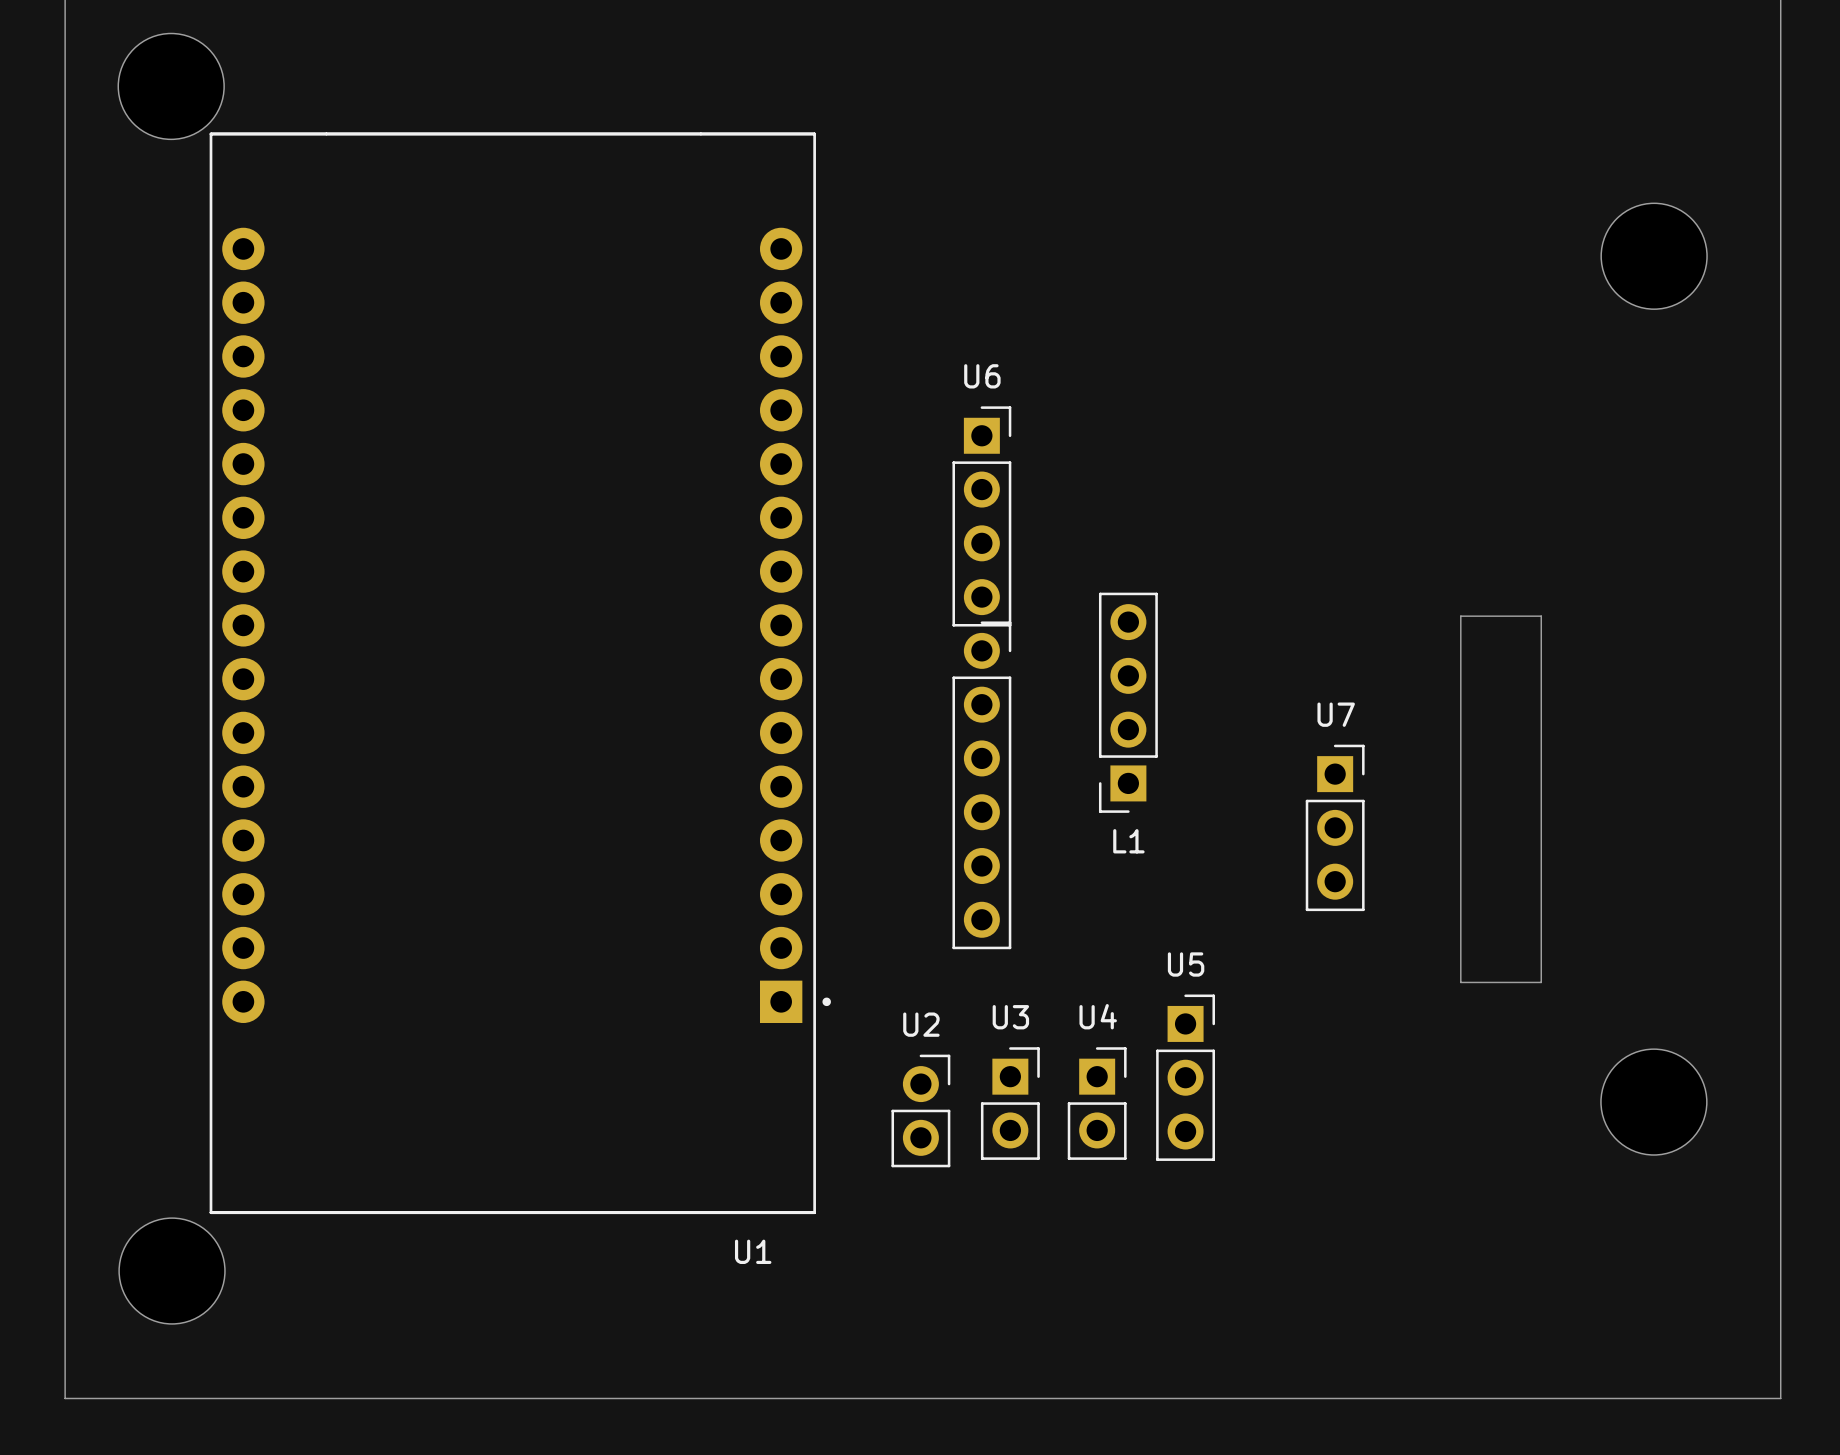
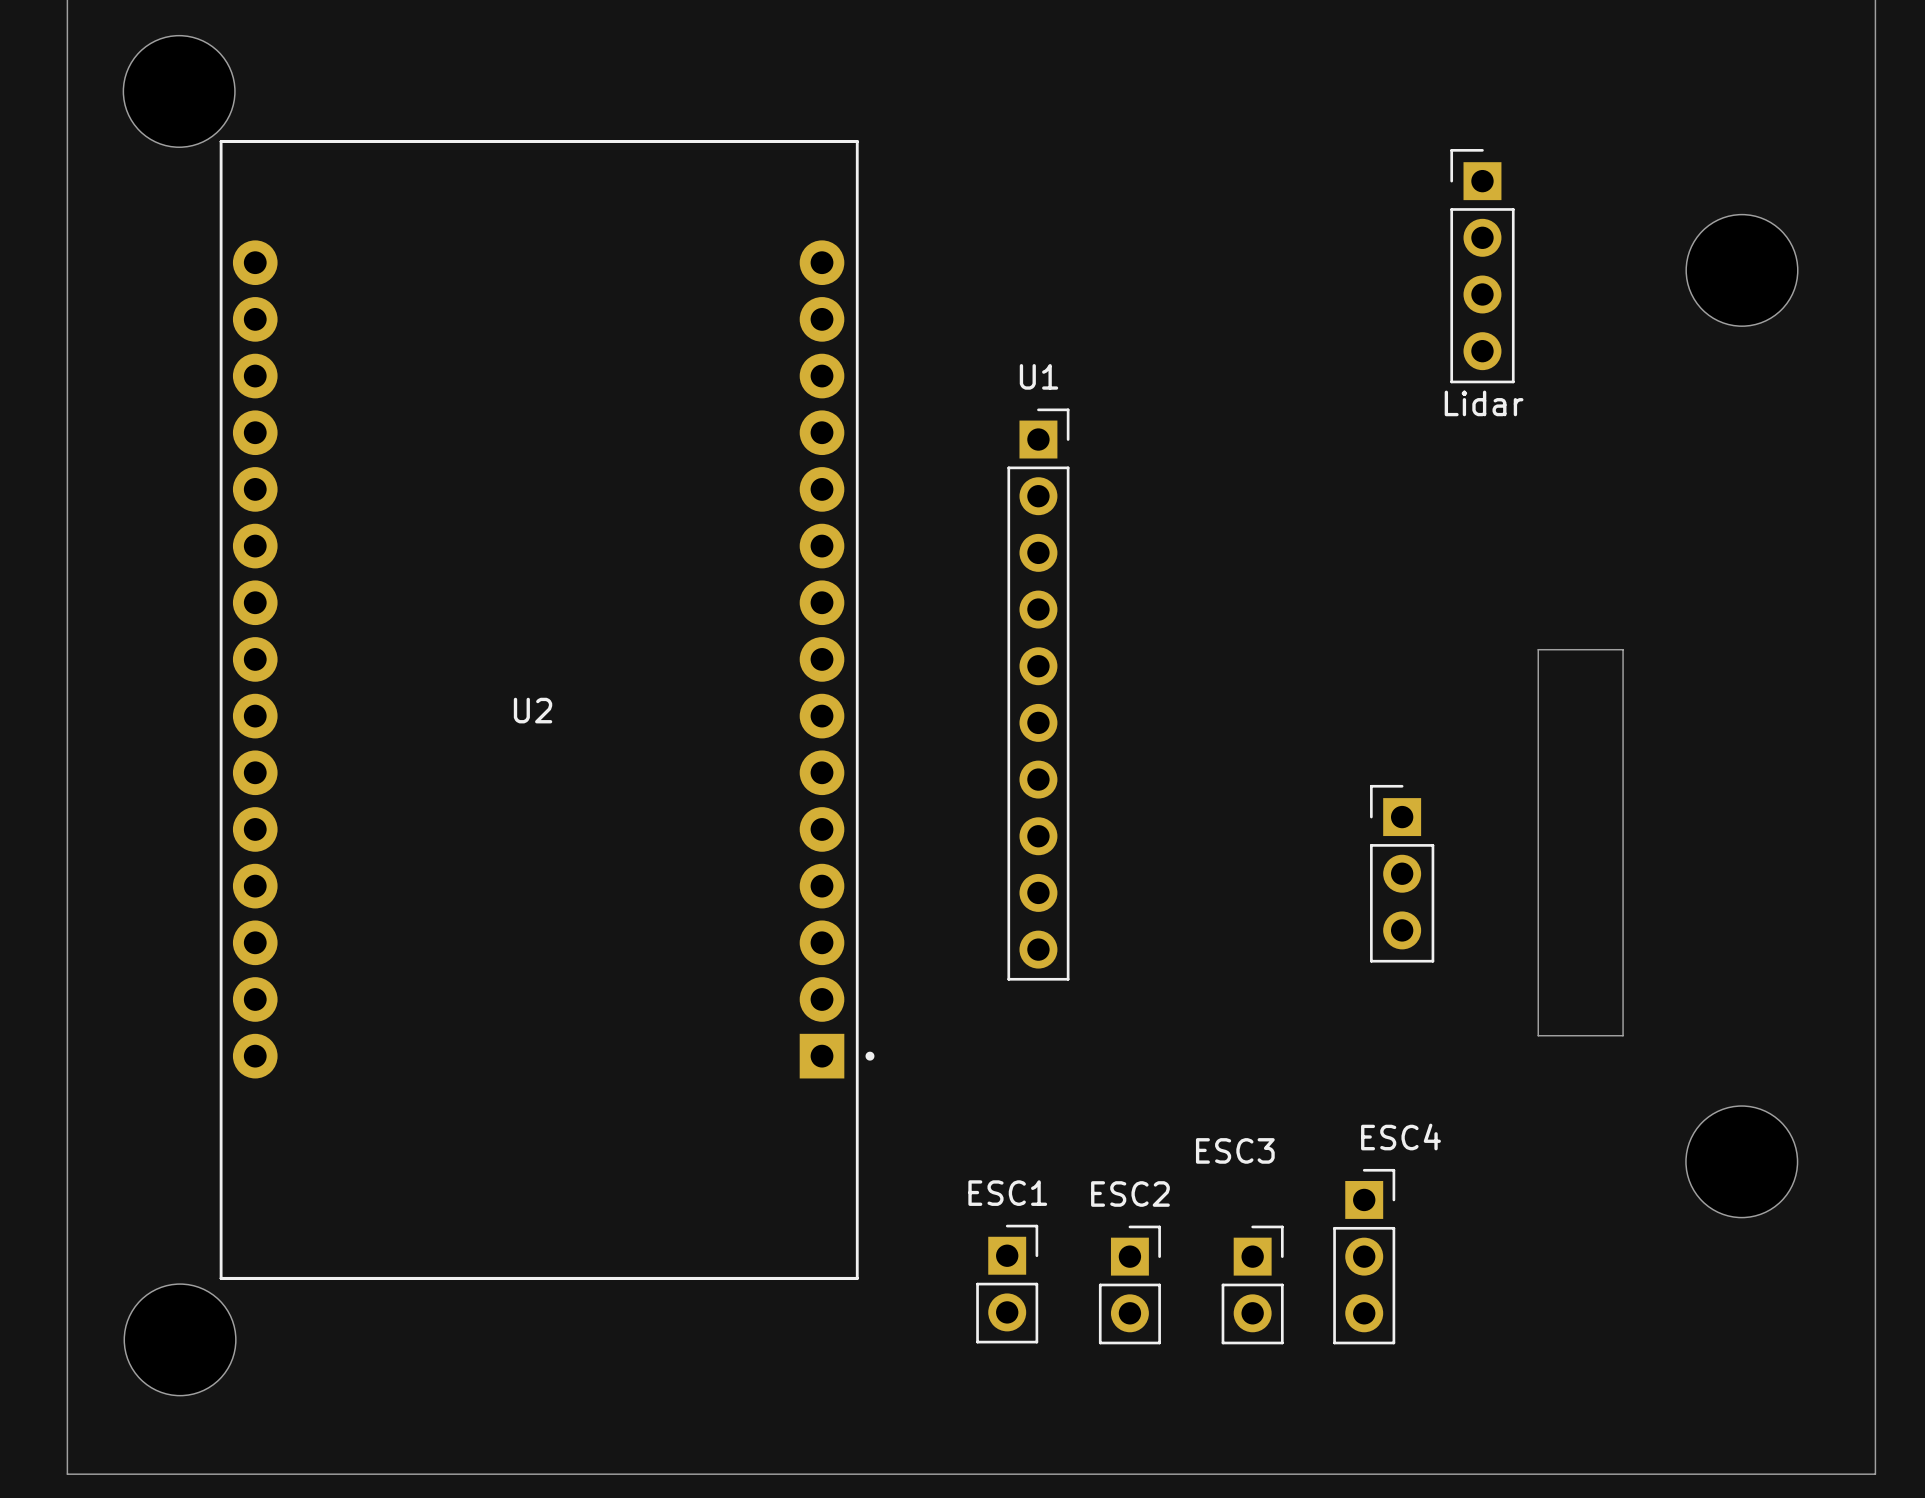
part: none -> Lidar (1482, 266)
U6: (981, 516) -> none
U1: none -> (1038, 694)
L1: (1128, 702) -> none
part: (981, 785) -> none
U7: (1335, 827) -> none
part: none -> (1402, 873)
U5: (1185, 1077) -> none
U3: (1010, 1103) -> none
U4: (1097, 1103) -> none
U2: (920, 1110) -> none
ESC4: none -> (1364, 1256)
ESC1: none -> (1007, 1284)
ESC2: none -> (1129, 1284)
ESC3: none -> (1252, 1284)
U1 name: U1 (753, 1251) -> U2 (533, 710)

